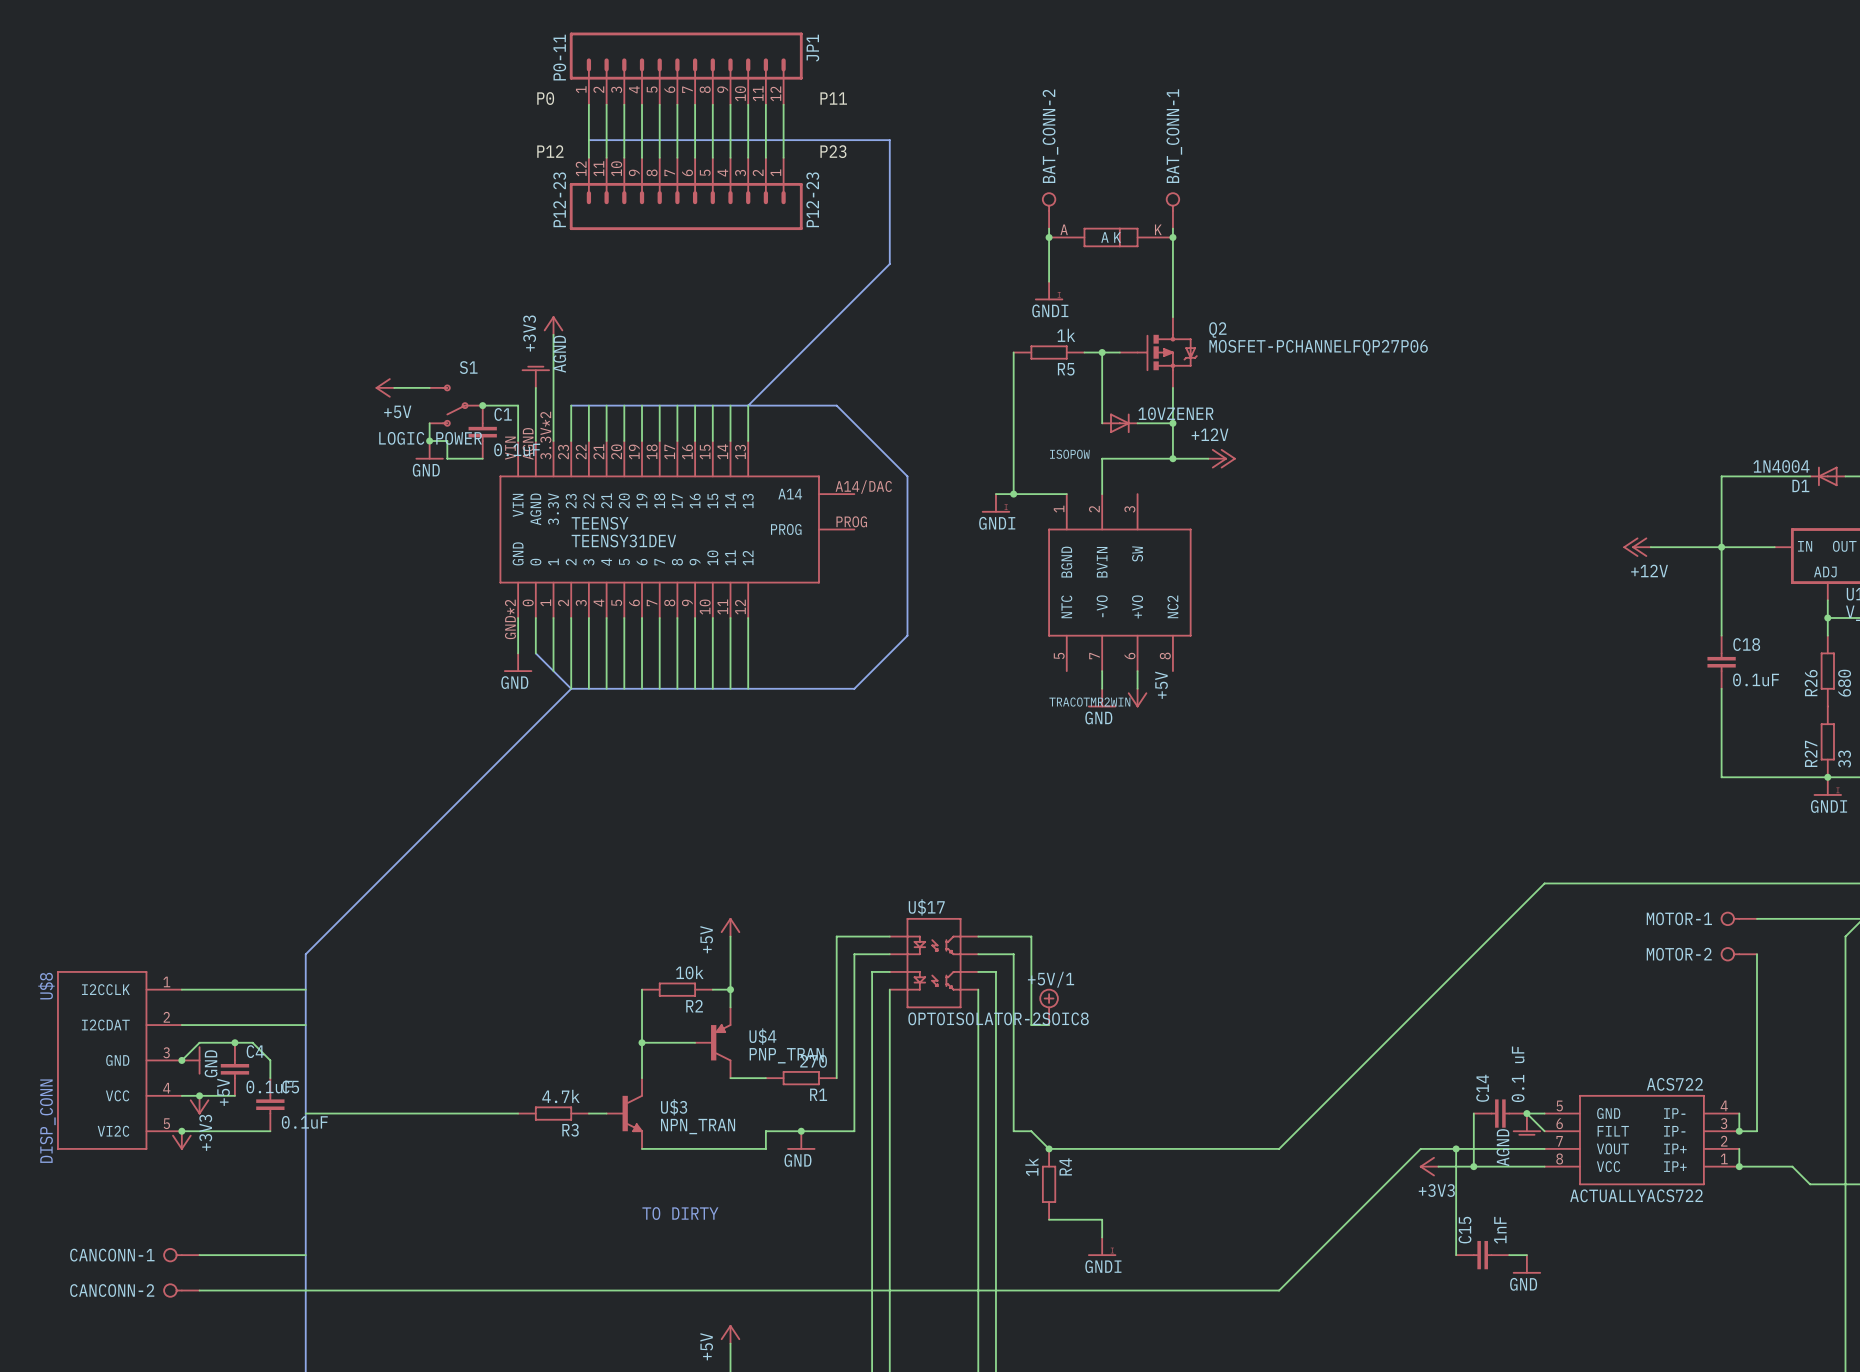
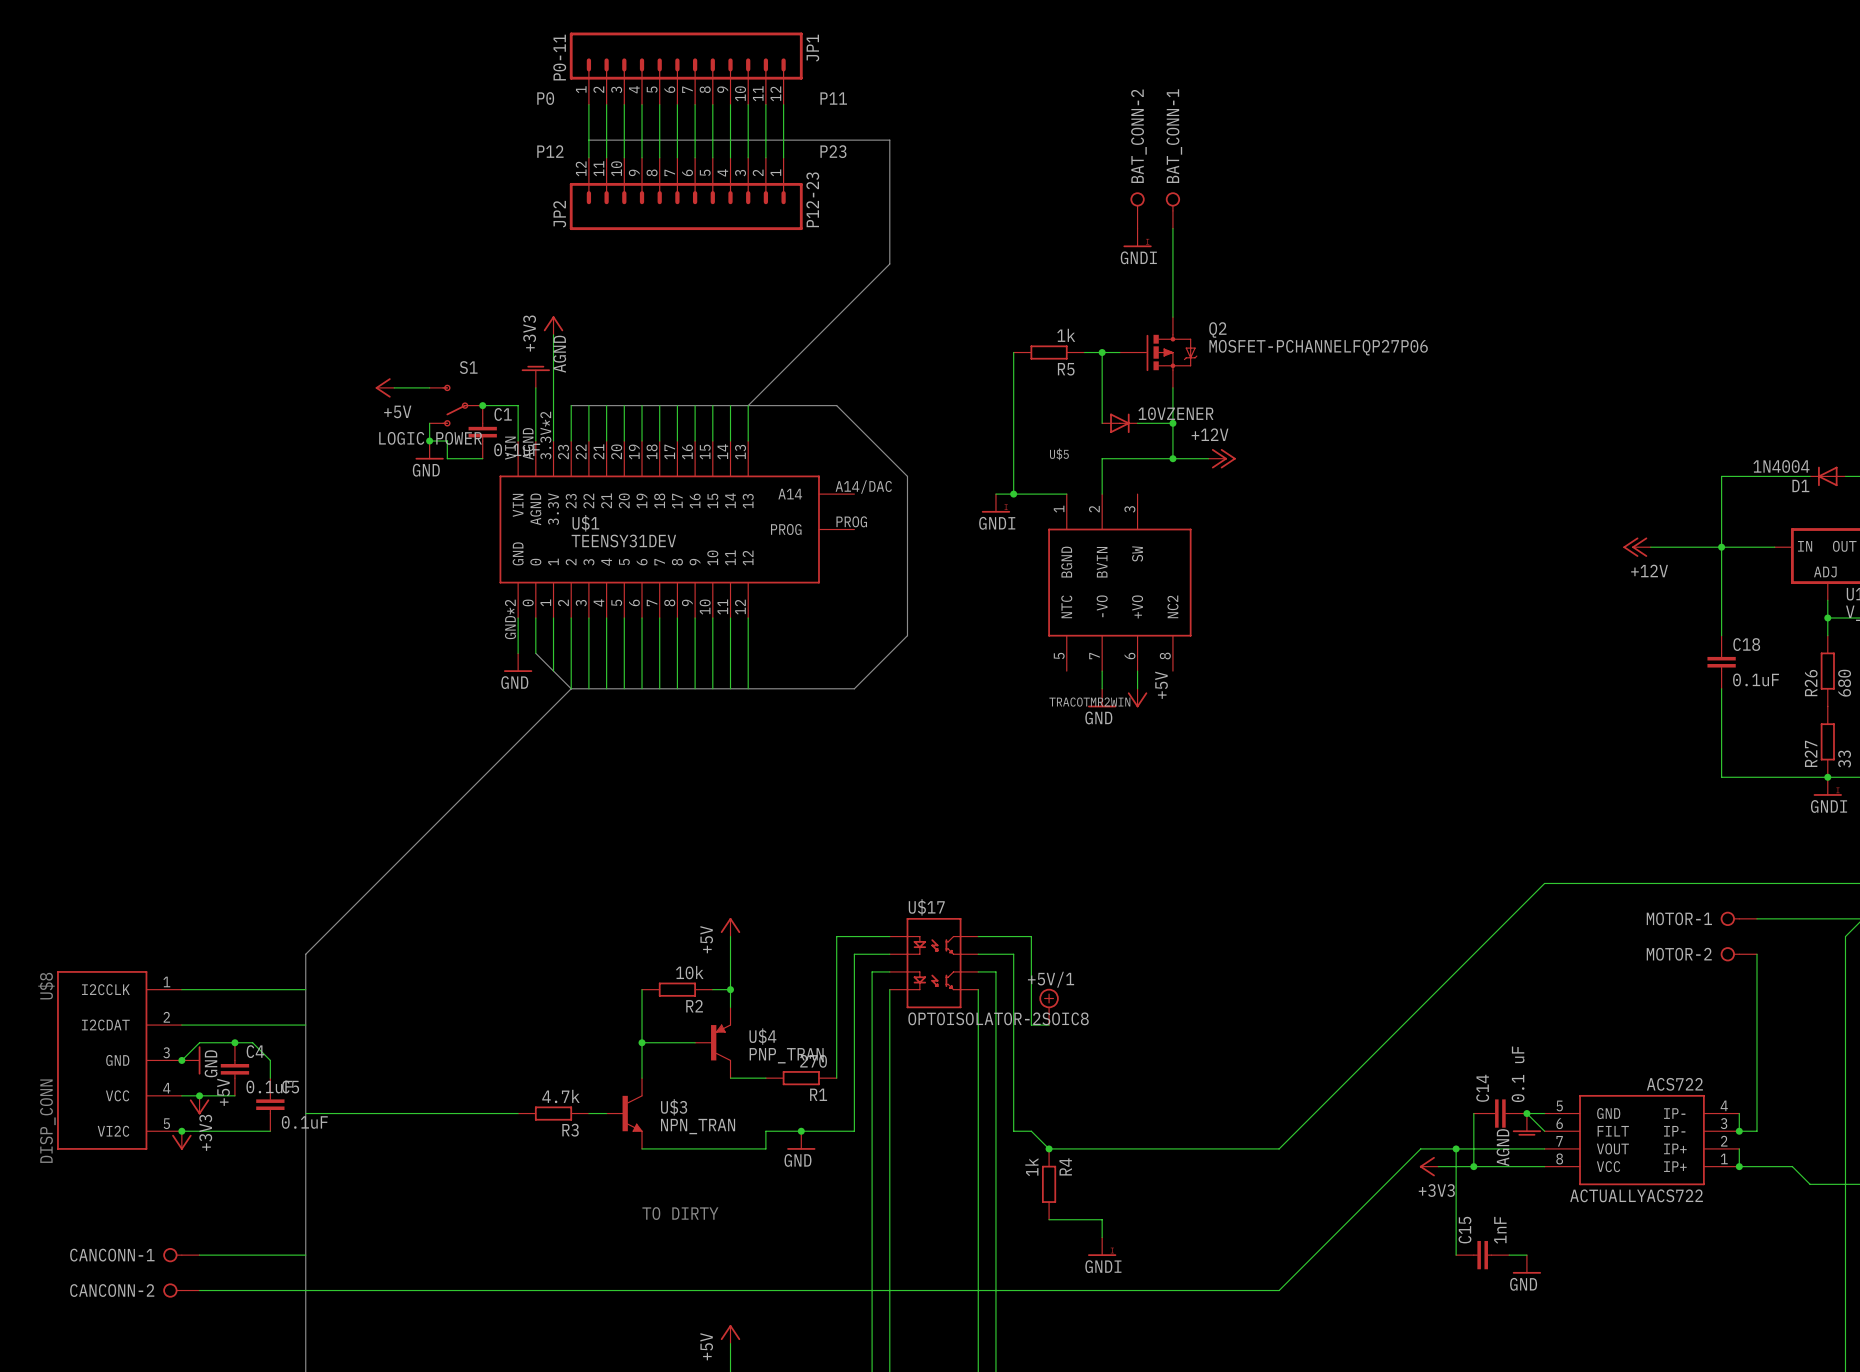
P12-23 name: P12-23 (559, 199) -> JP2 (559, 214)
BAT_CONN-2 position: (1049, 210) -> (1137, 210)
wire: (1049, 228) (1049, 281) -> none
junction: (1049, 237) -> none
part: (1111, 237) -> none
junction: (1172, 237) -> none
power symbol position: GNDI (1049, 291) -> GNDI (1137, 237)
ISOPOW name: ISOPOW (1069, 454) -> U$5 (1059, 454)
TEENSY name: TEENSY (600, 523) -> U$1 (585, 523)

